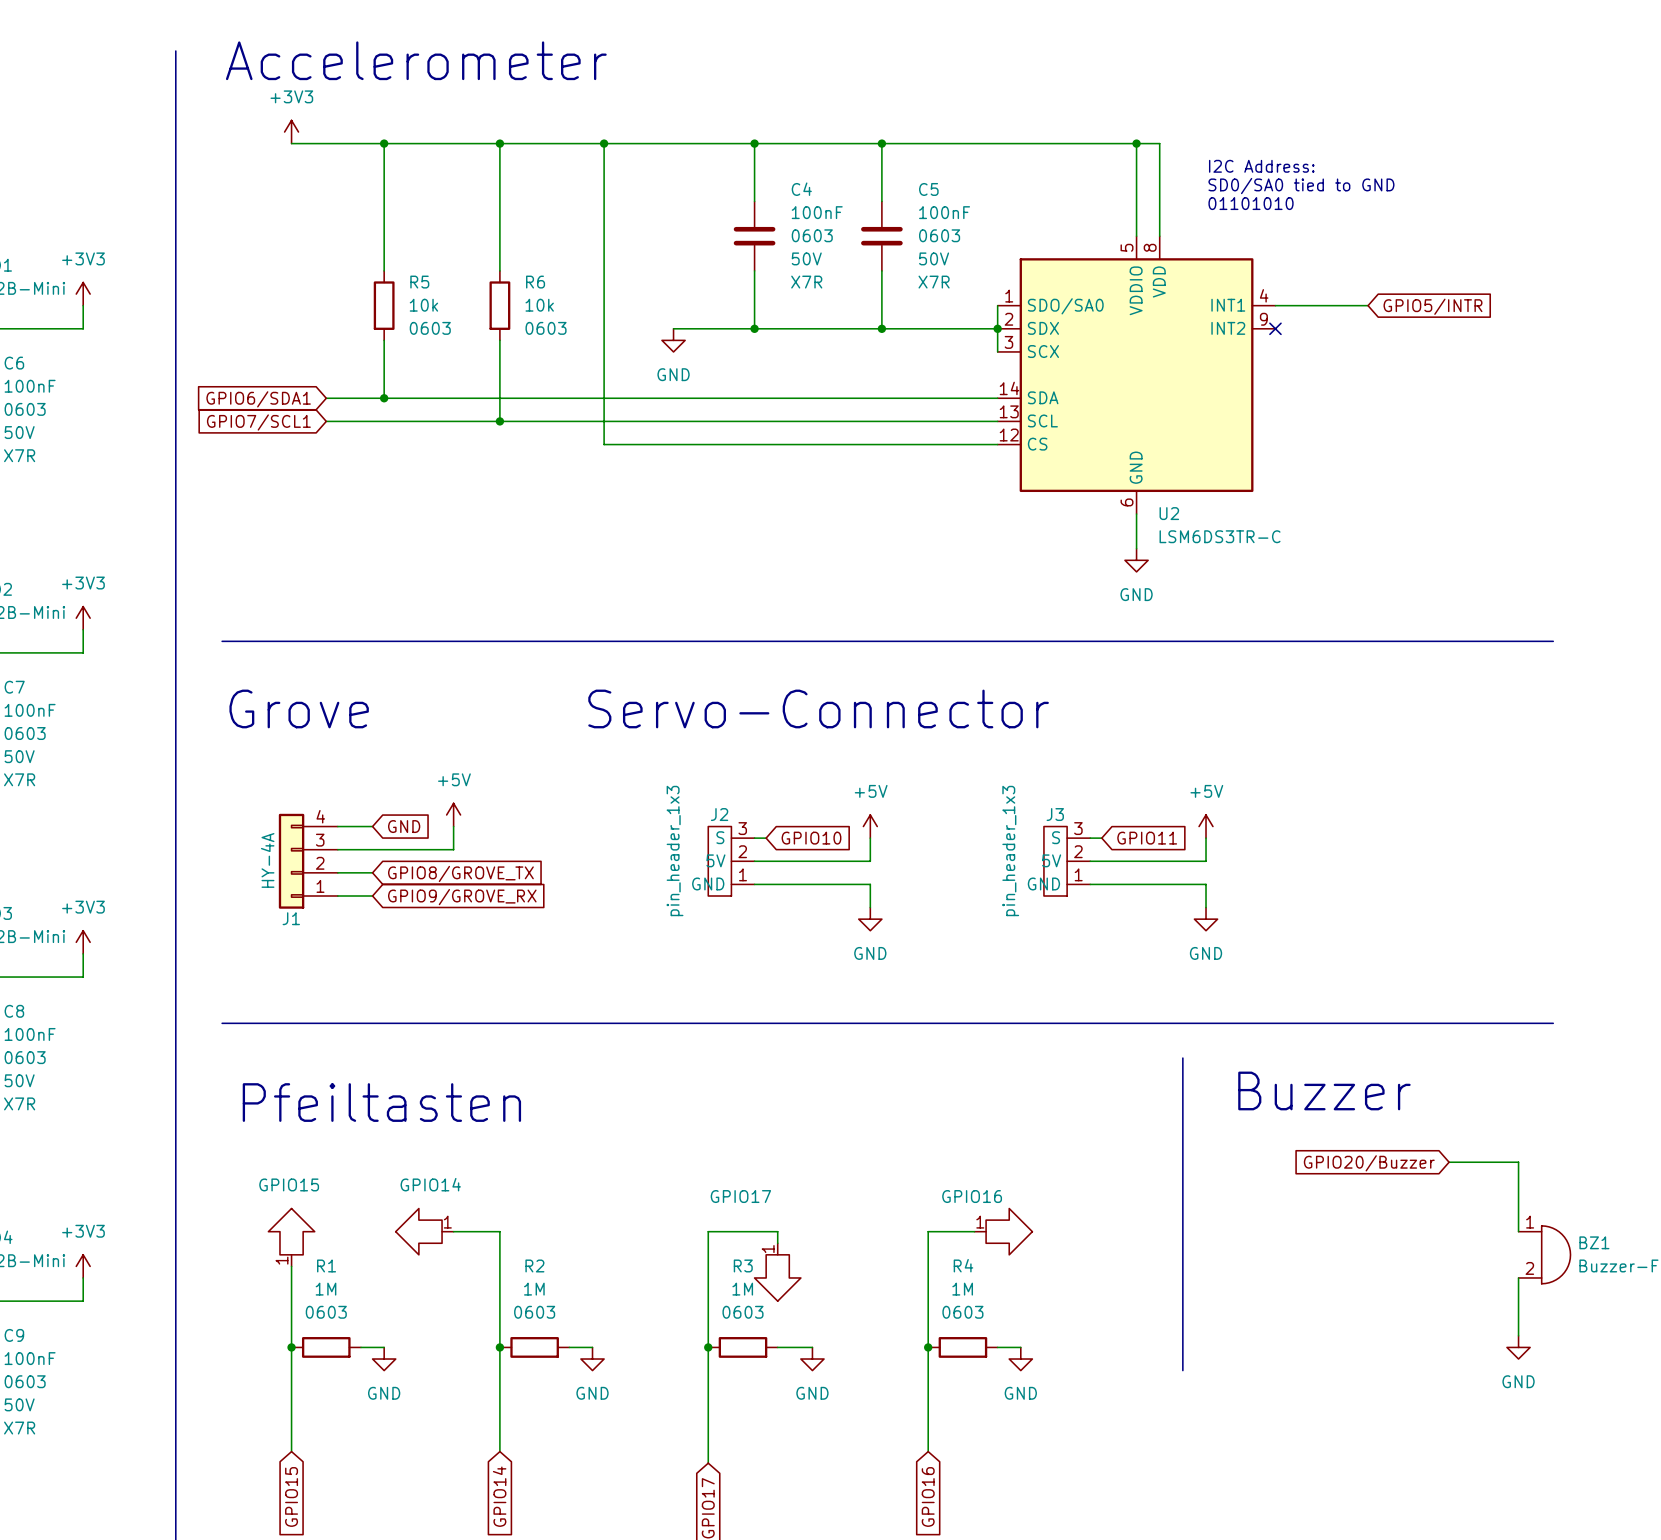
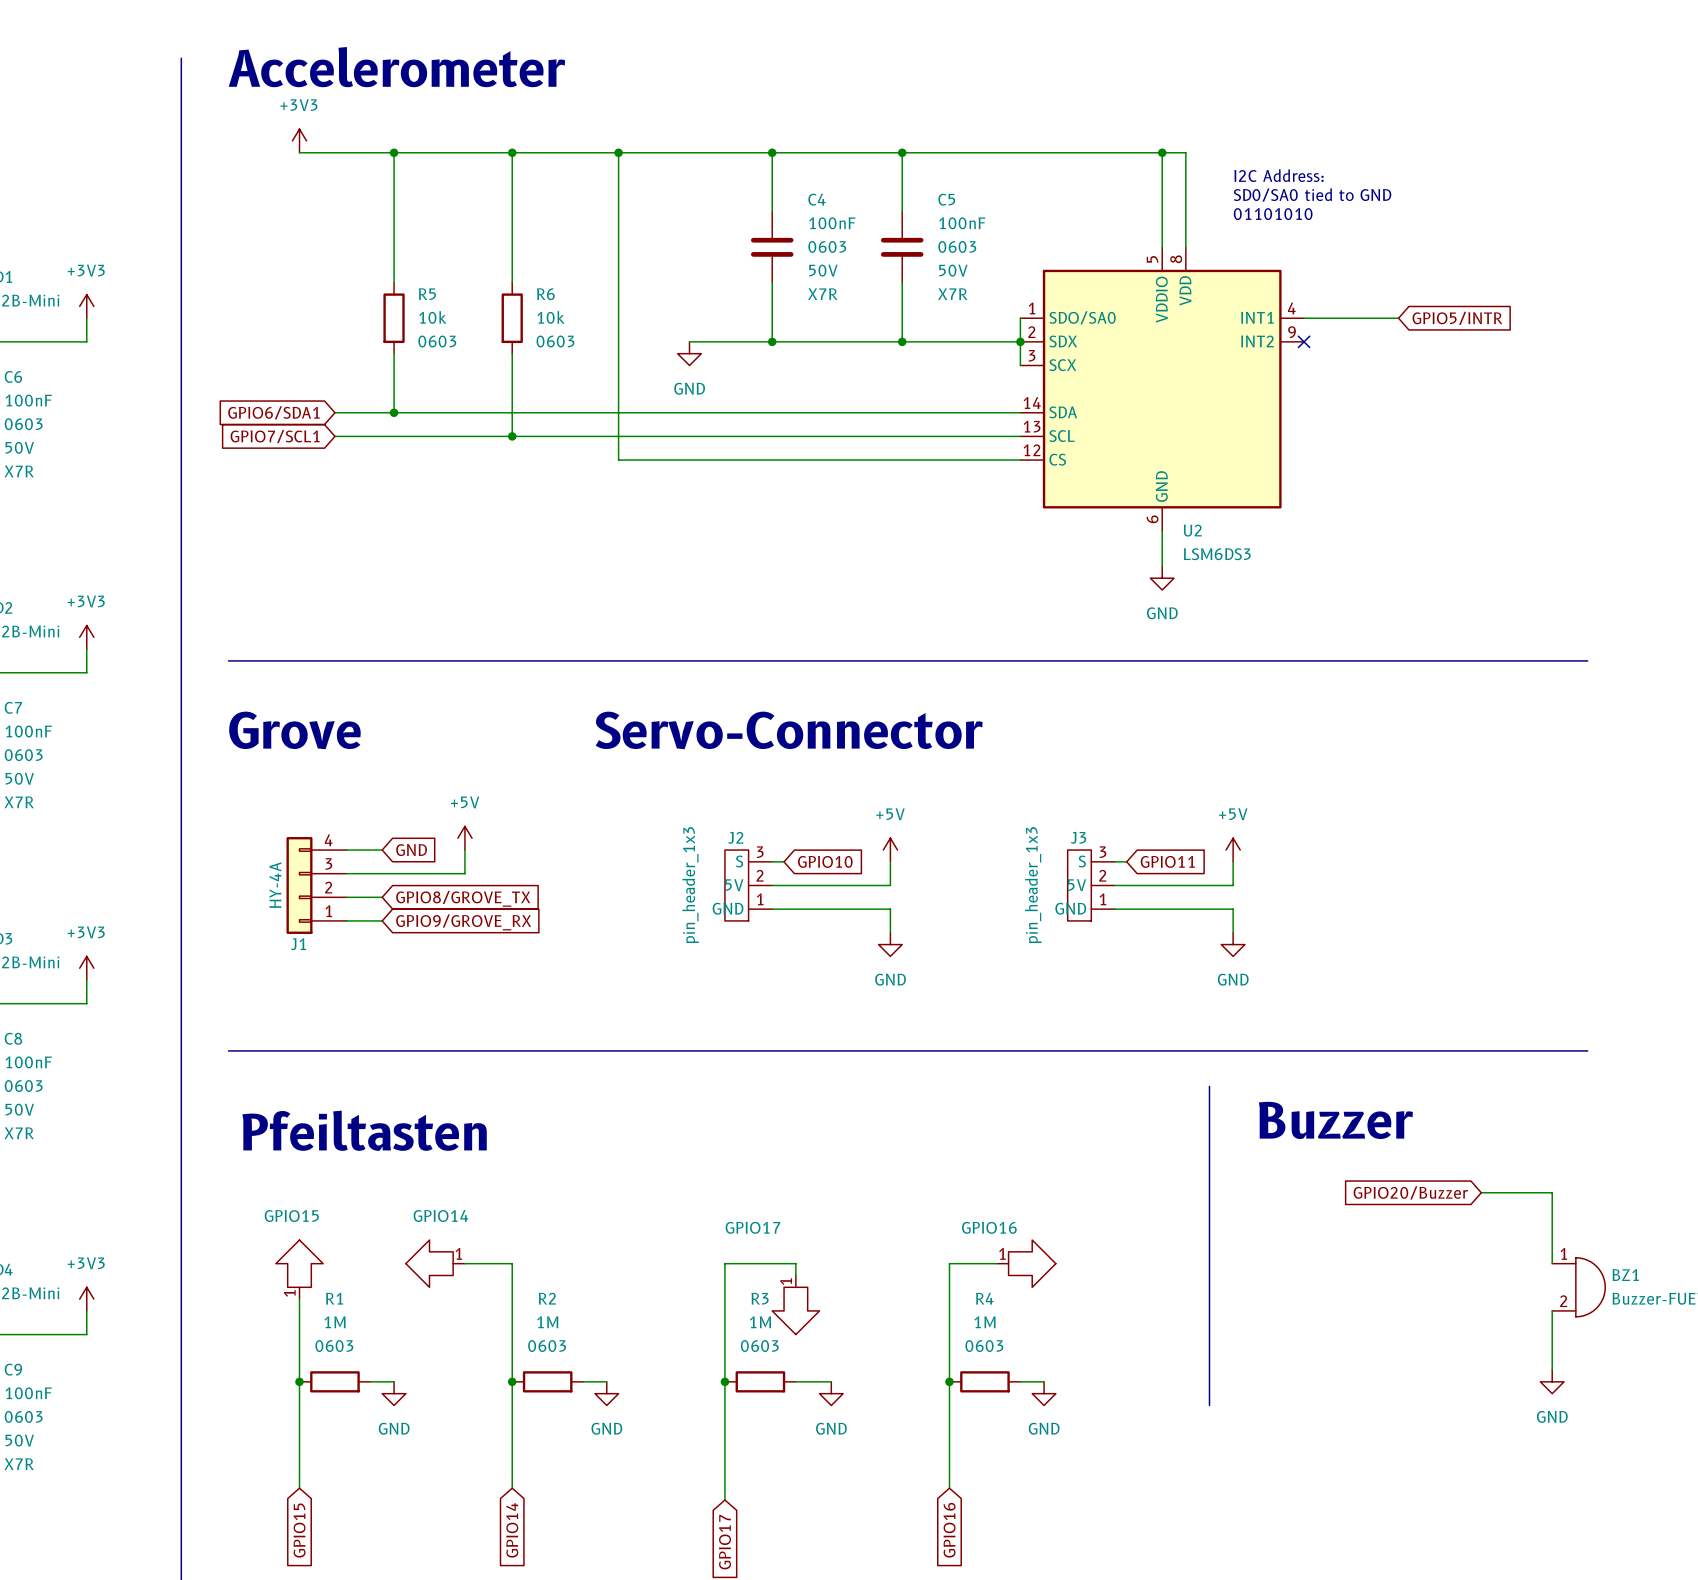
U2 value: LSM6DS3TR-C (1220, 536) -> LSM6DS3 (1217, 554)

